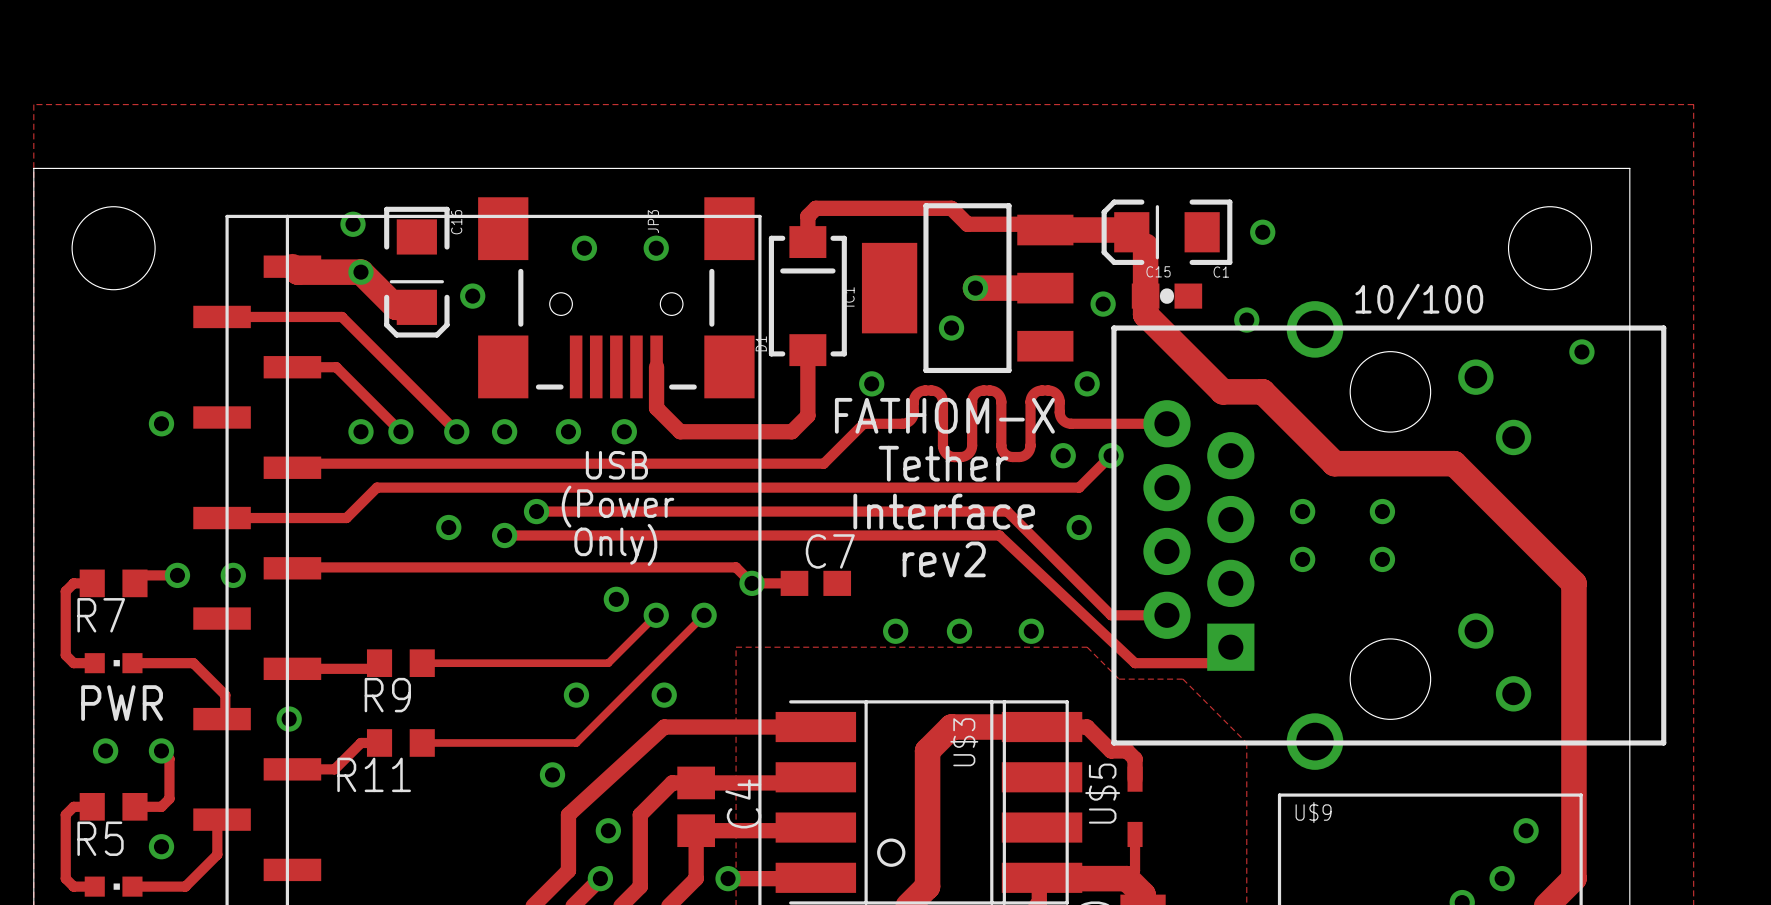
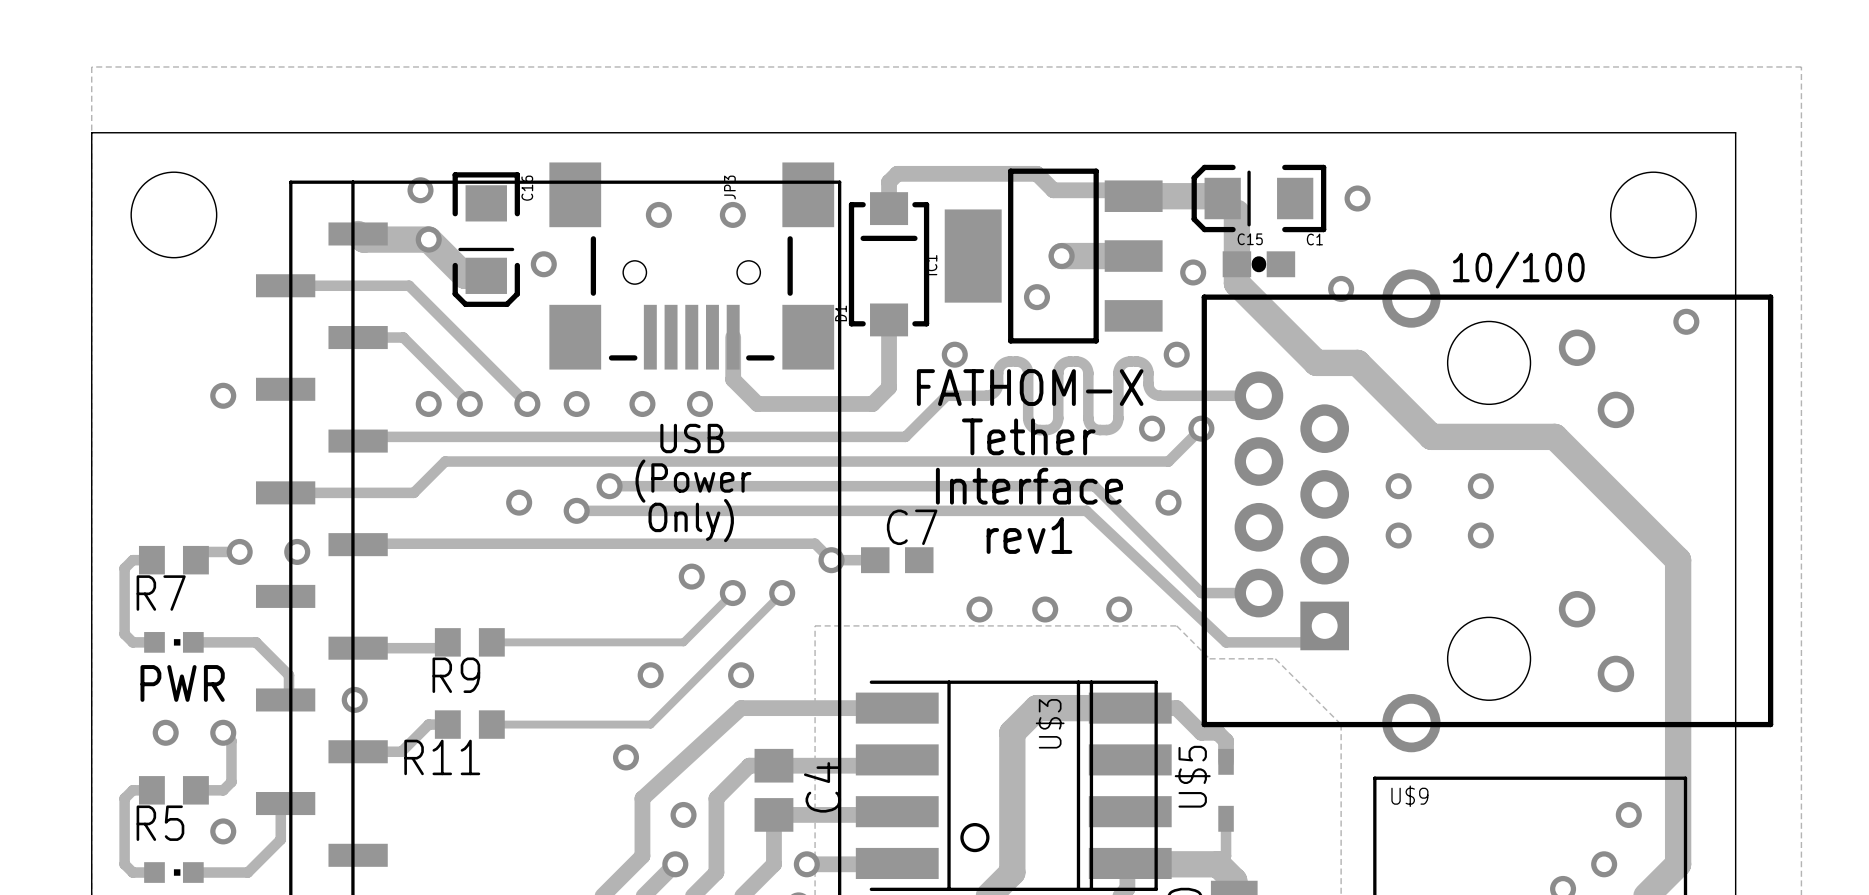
text: rev2 (944, 559) -> rev1 (1029, 535)

